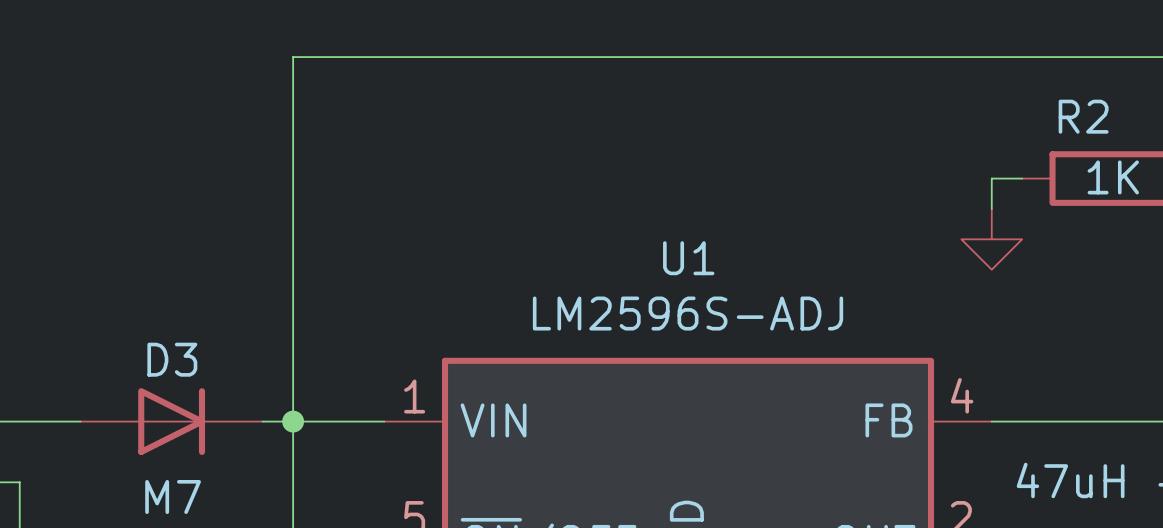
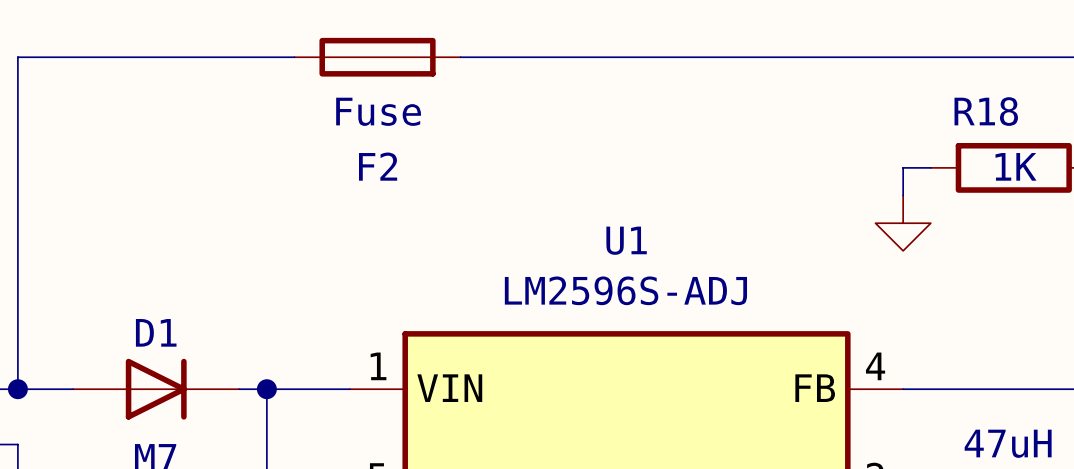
wire: (293, 57) (293, 421) -> (266, 57) (17, 57) (17, 389)
F2: none -> Fuse (377, 57)
R2 name: R2 (1083, 116) -> R18 (986, 111)
D3 name: D3 (172, 359) -> D1 (156, 332)
junction: none -> (17, 389)

